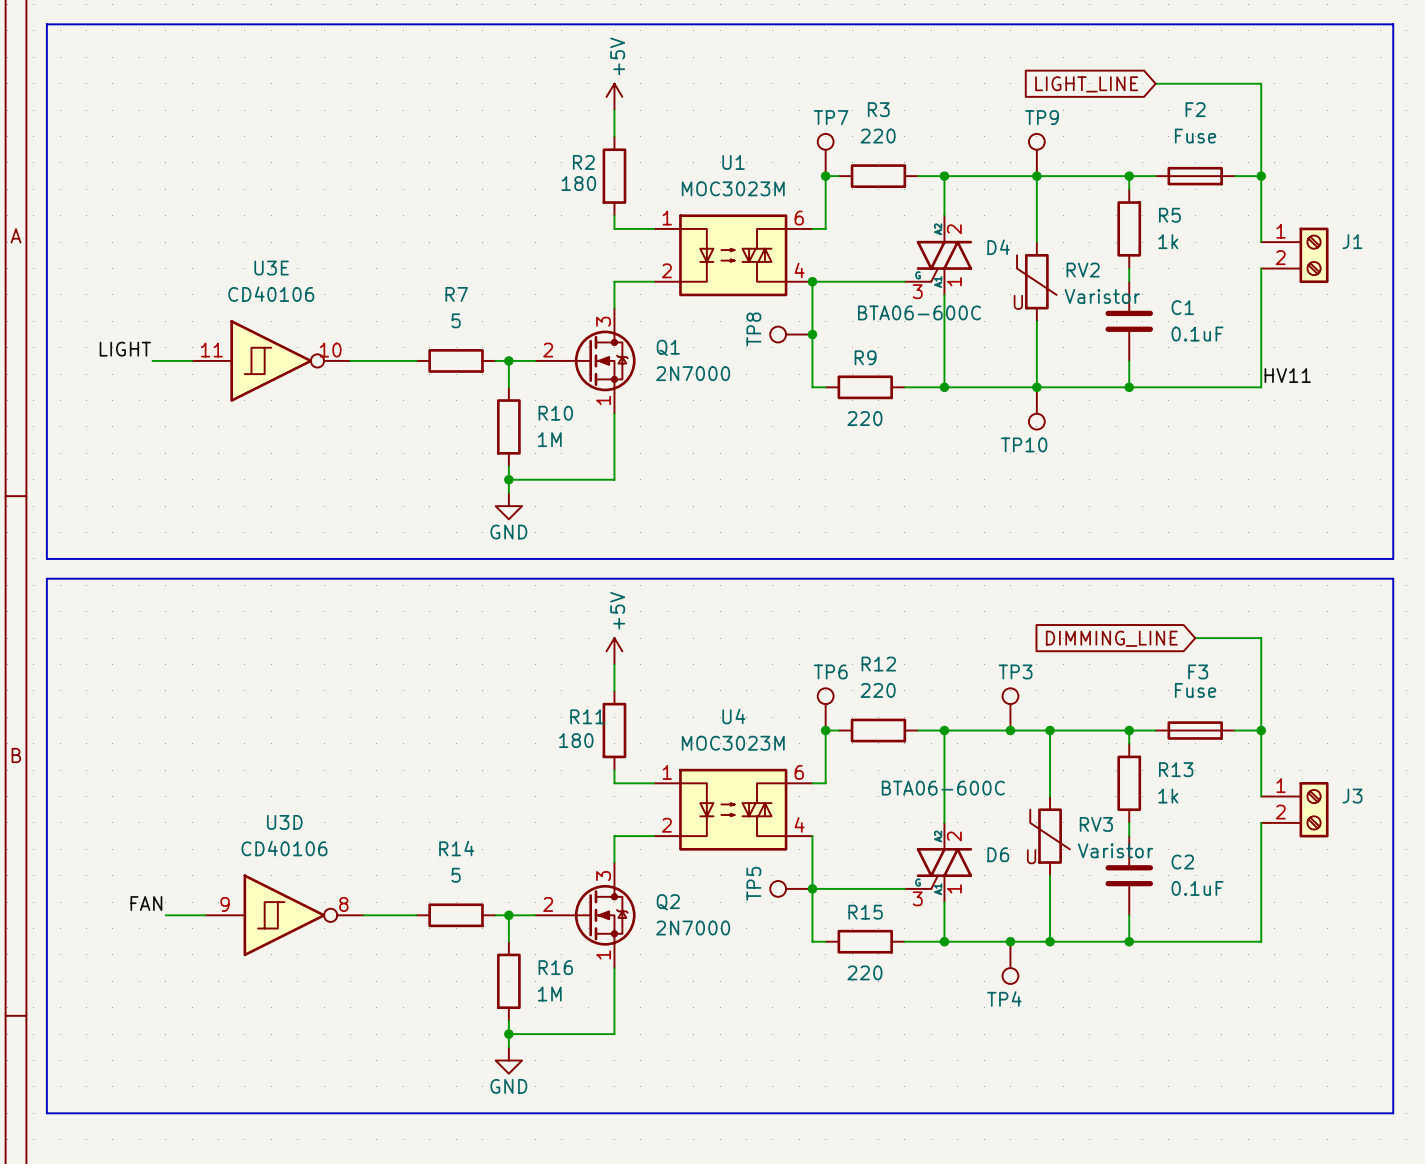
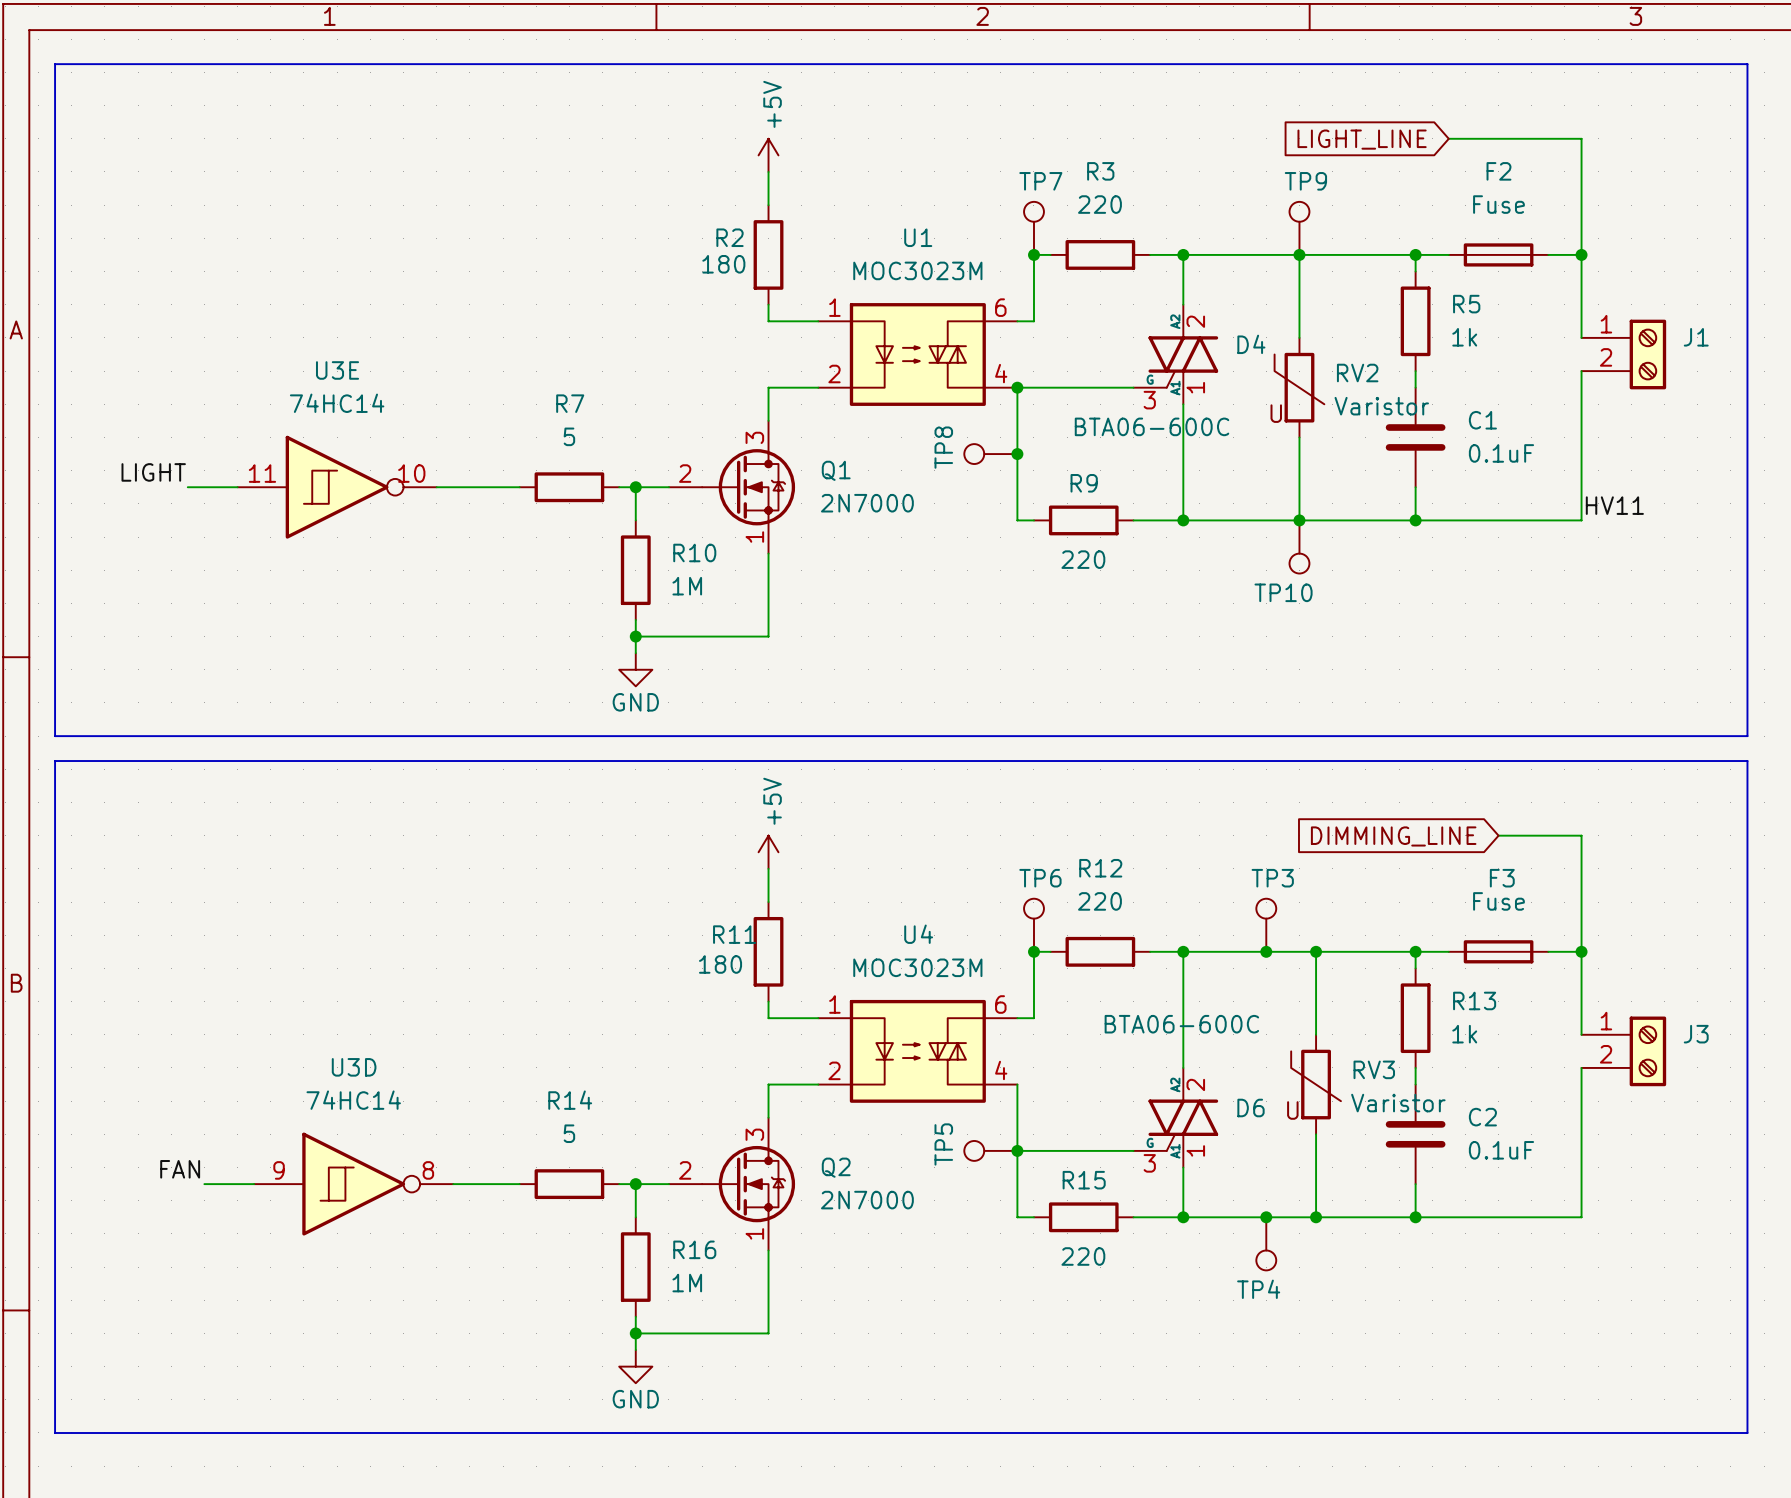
U3E value: CD40106 (271, 294) -> 74HC14 (337, 403)
U3D value: CD40106 (284, 848) -> 74HC14 (353, 1100)

